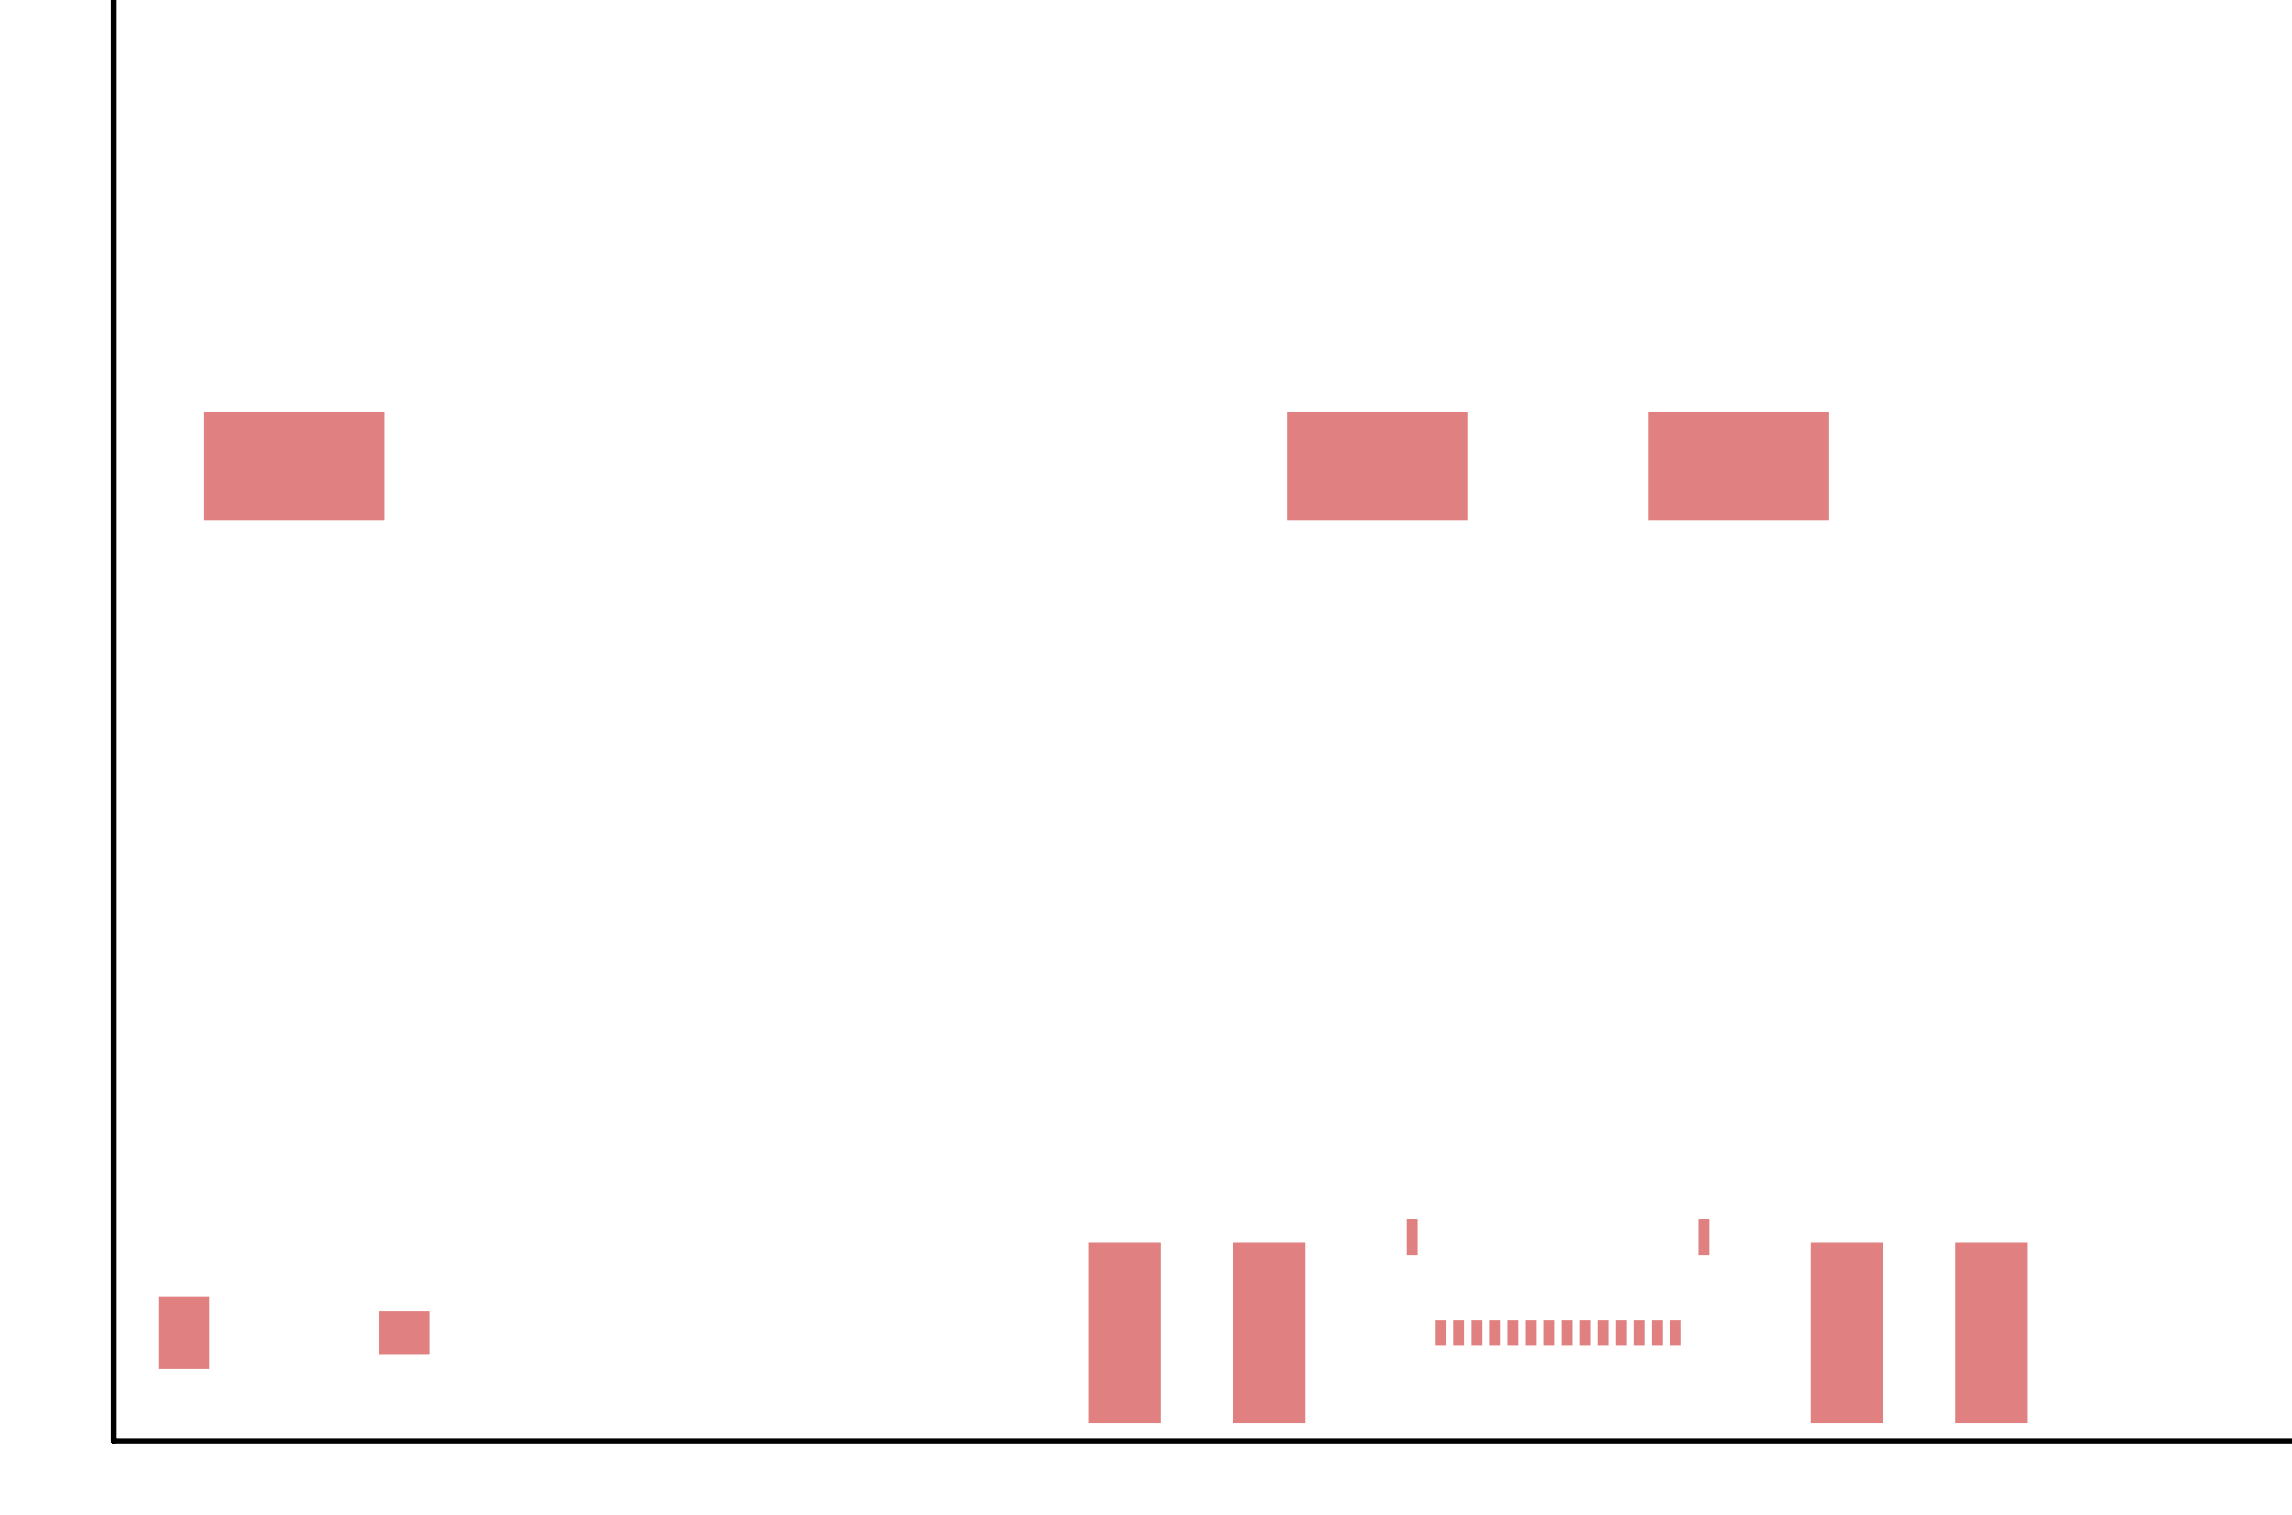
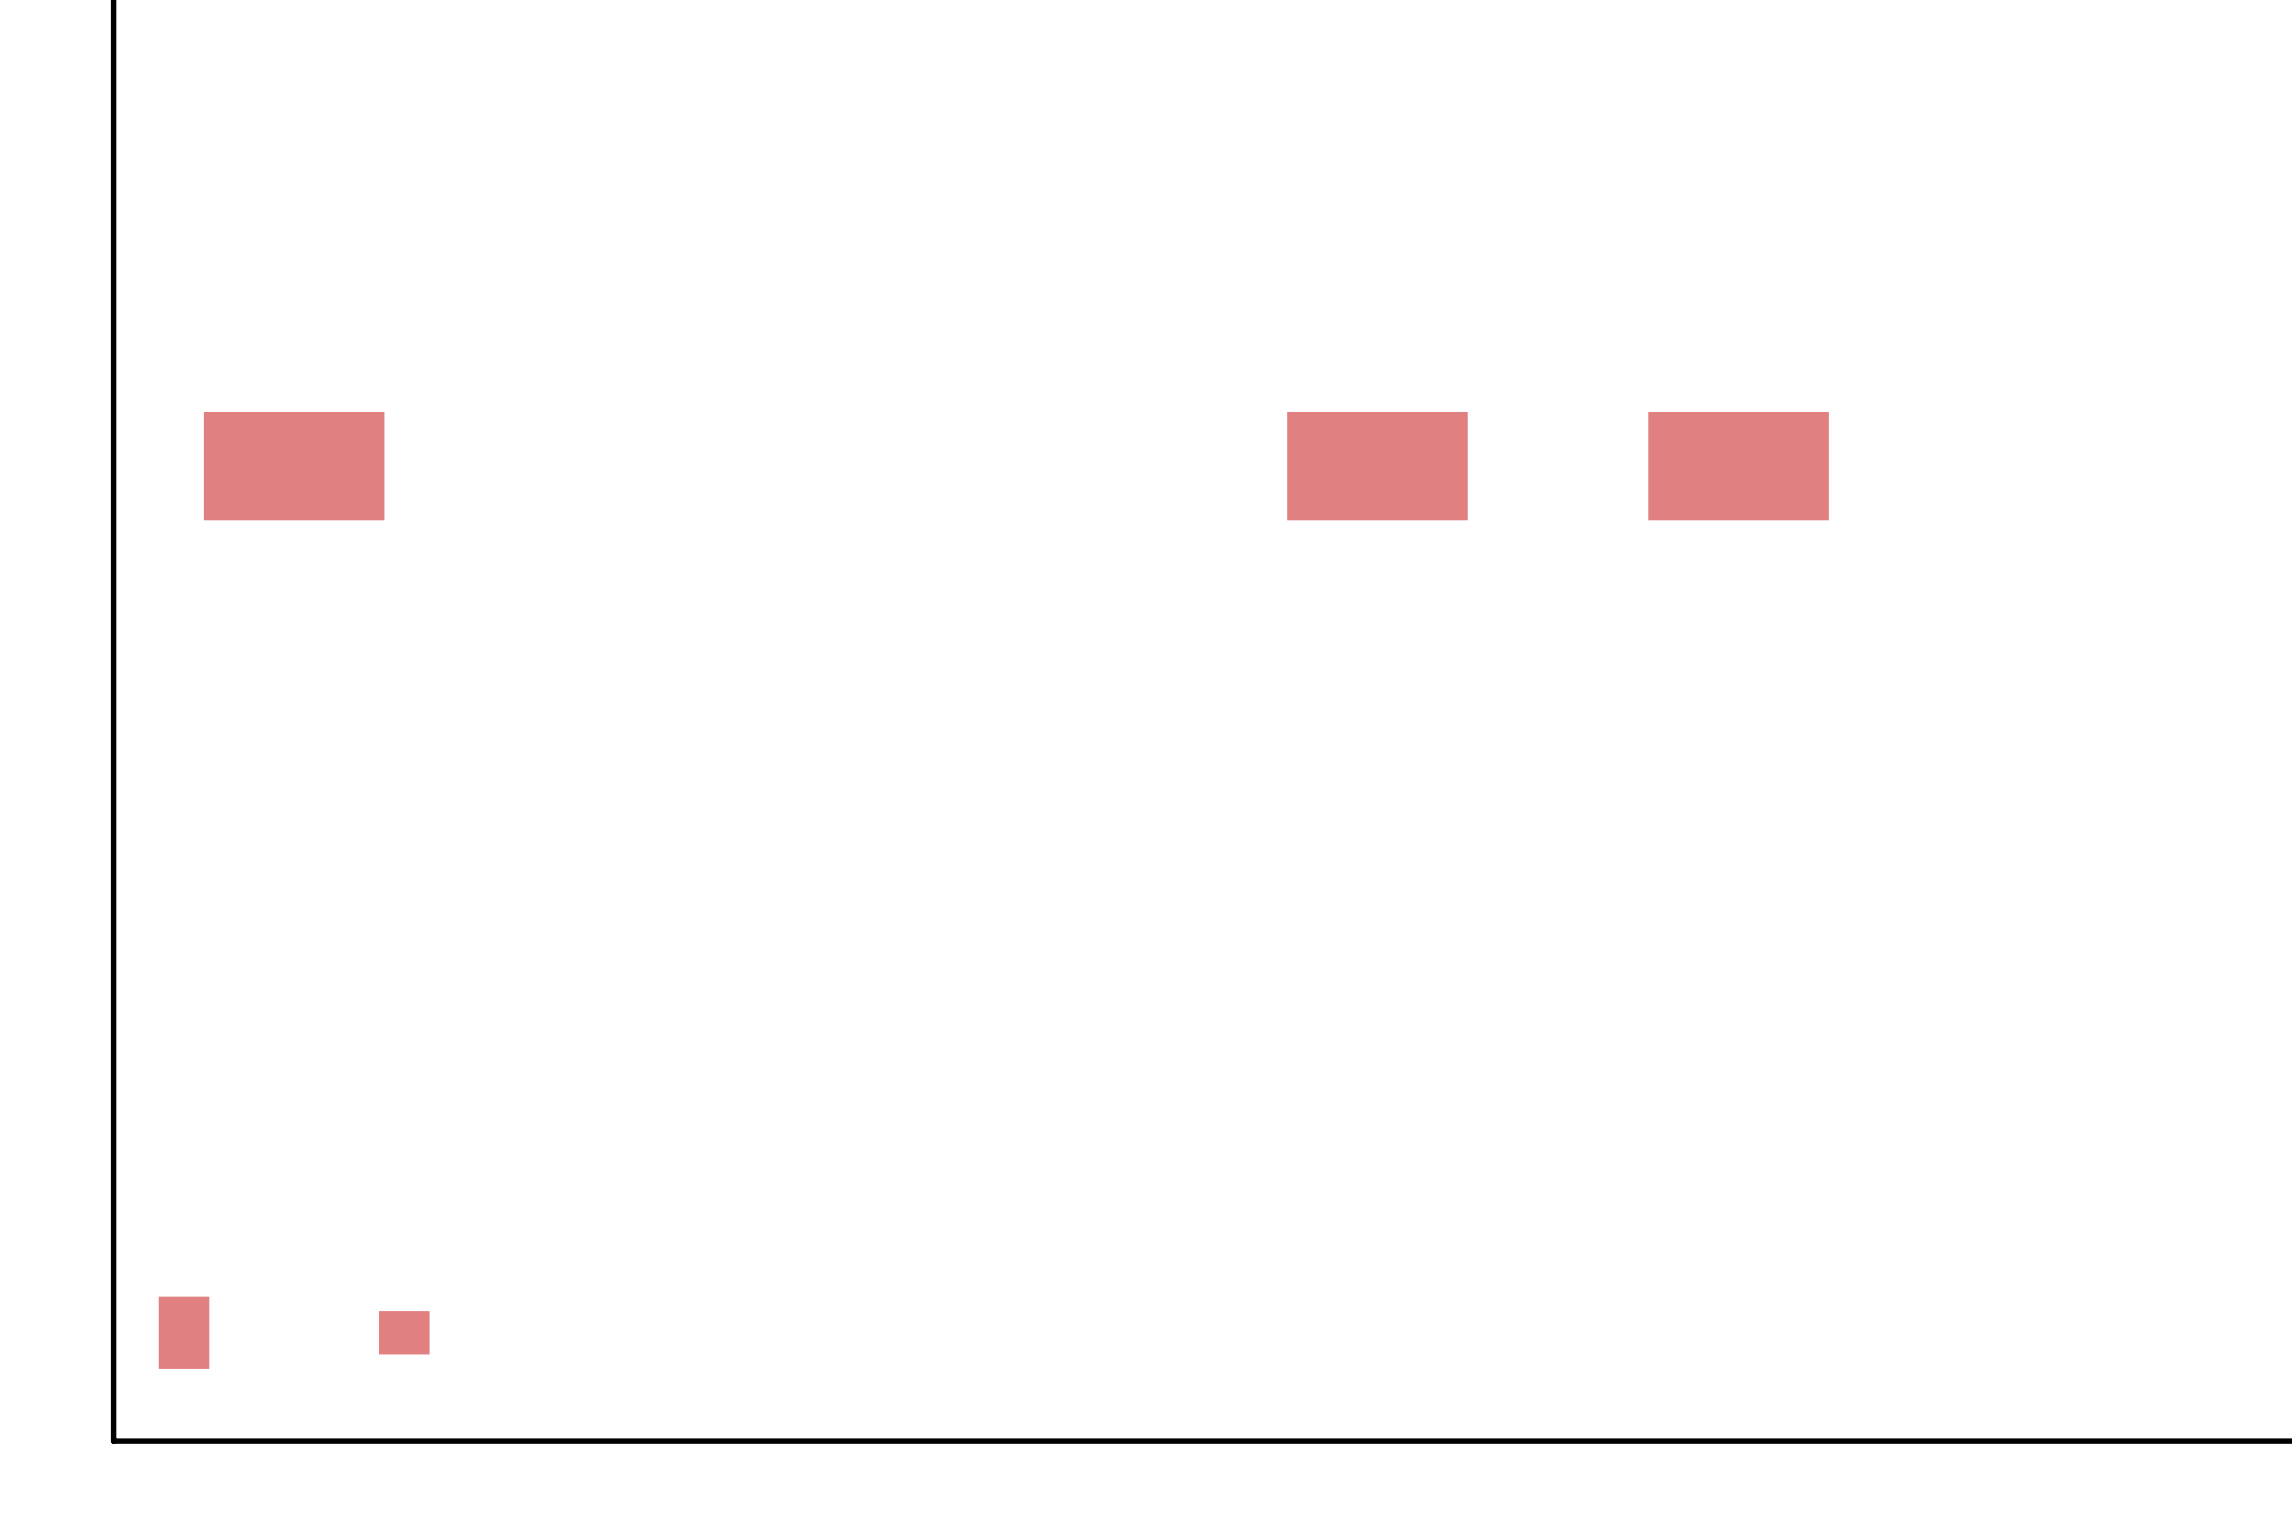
part: (1558, 1282) -> none
part: (1124, 1332) -> none
part: (1269, 1332) -> none
part: (1846, 1332) -> none
part: (1991, 1332) -> none

